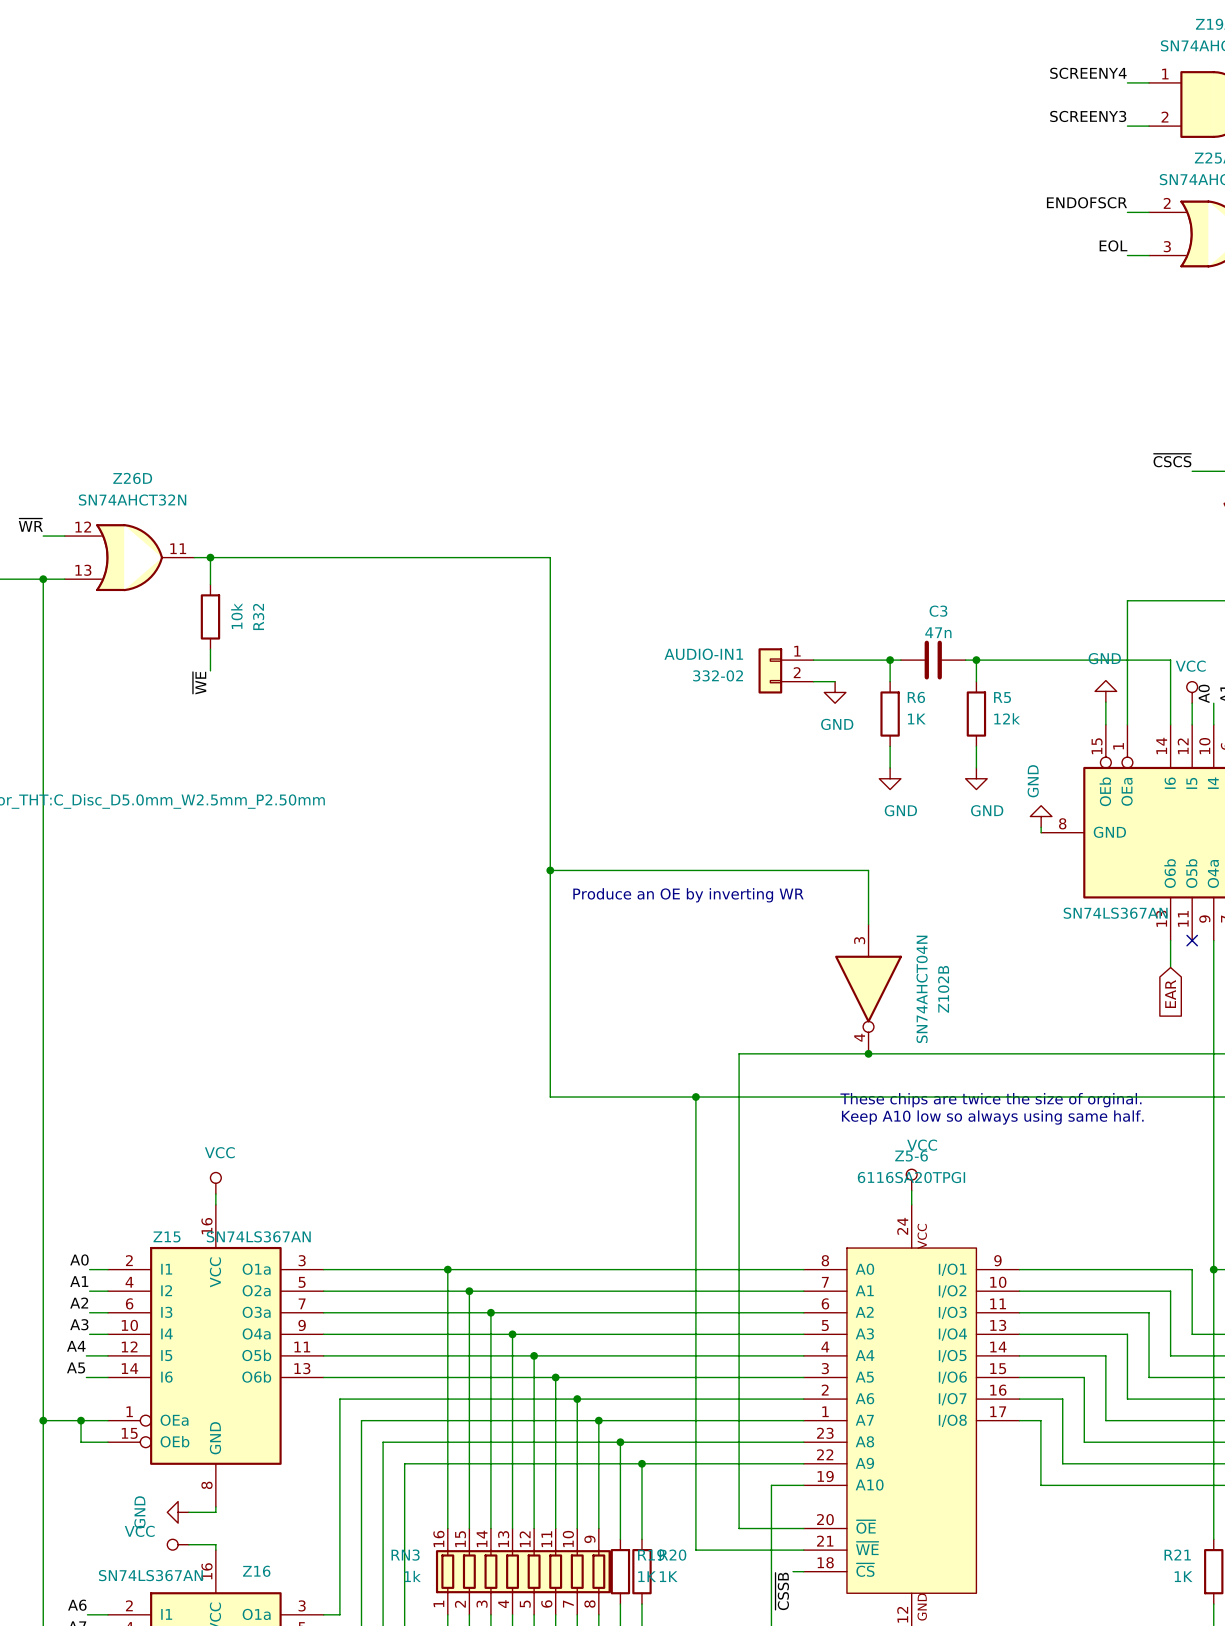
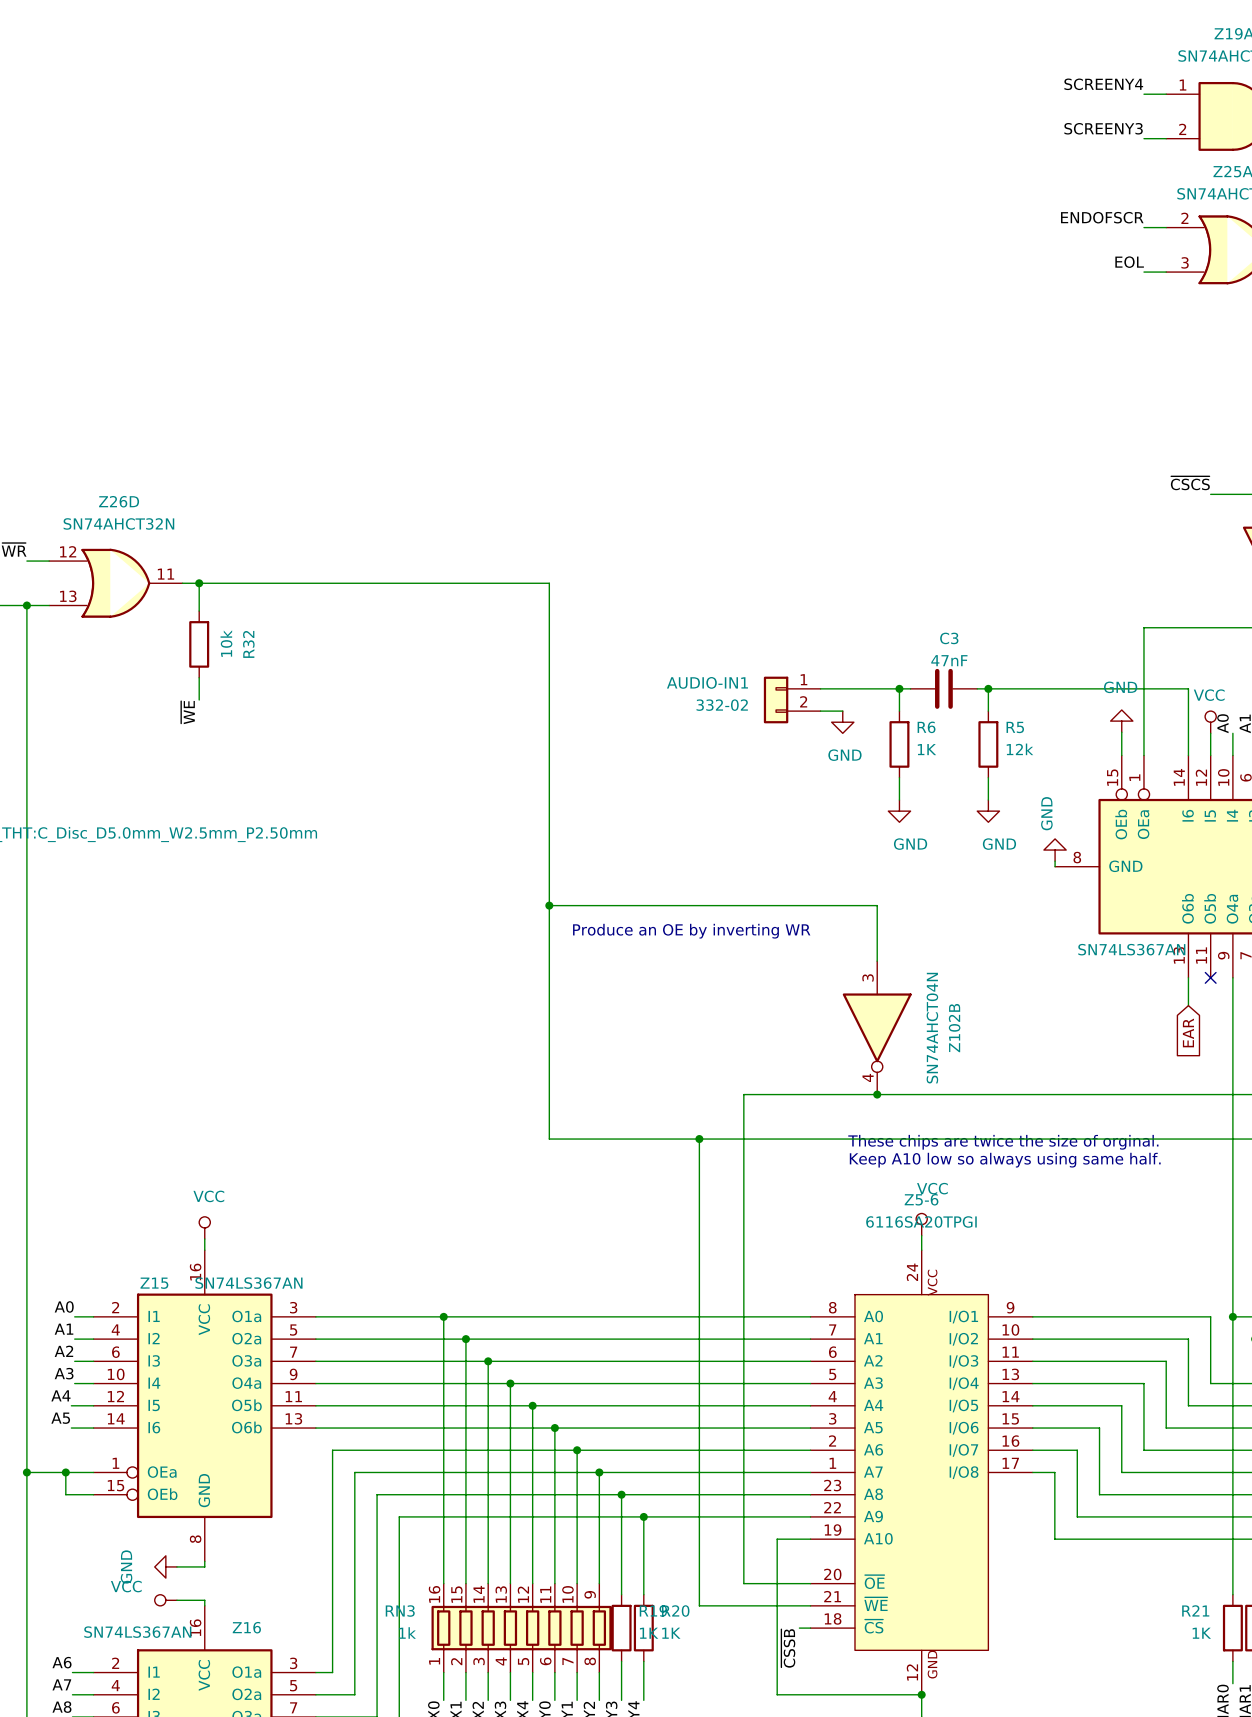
C3 value: 47n (938, 632) -> 47nF (949, 660)

